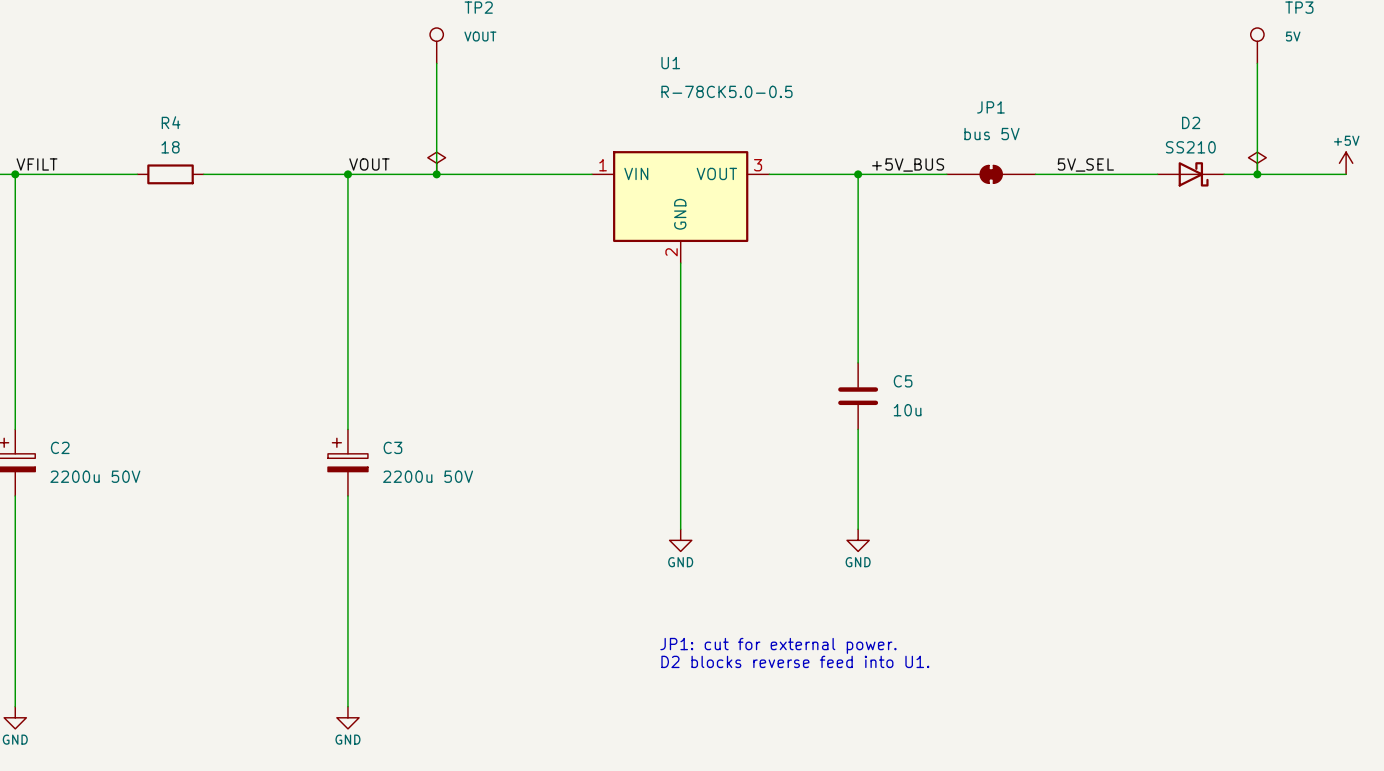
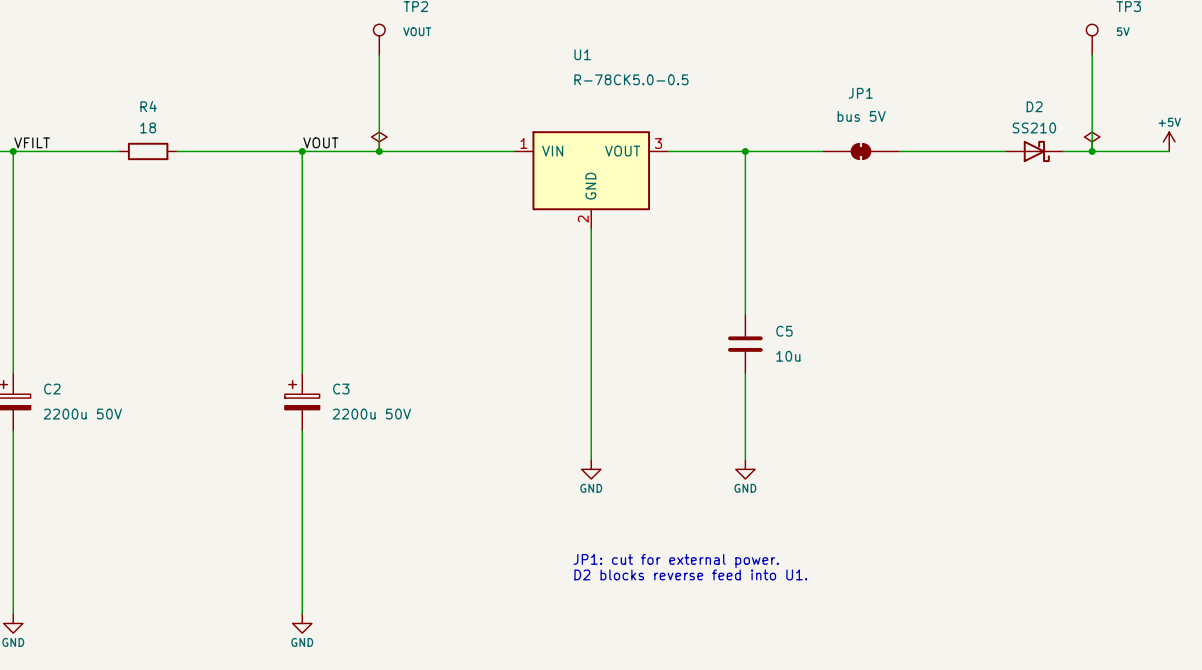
label: +5V_BUS (908, 165) -> none
label: 5V_SEL (1085, 165) -> none

